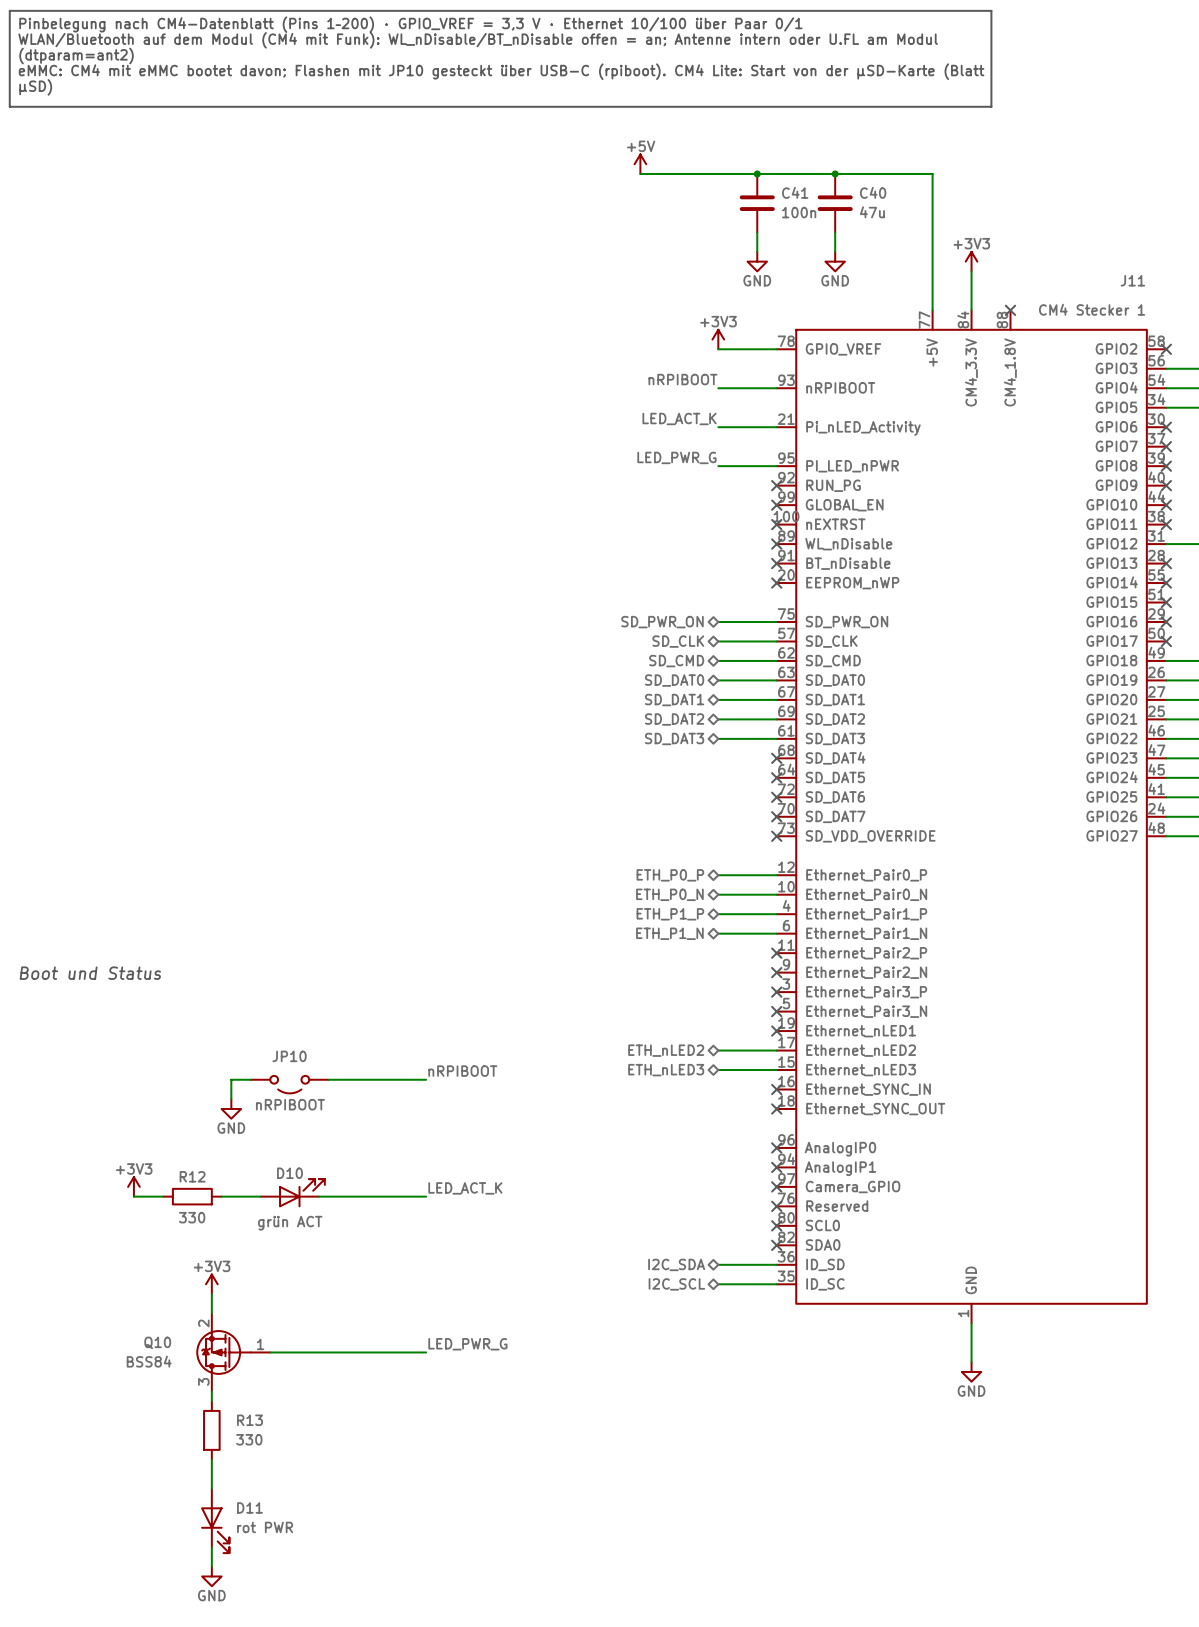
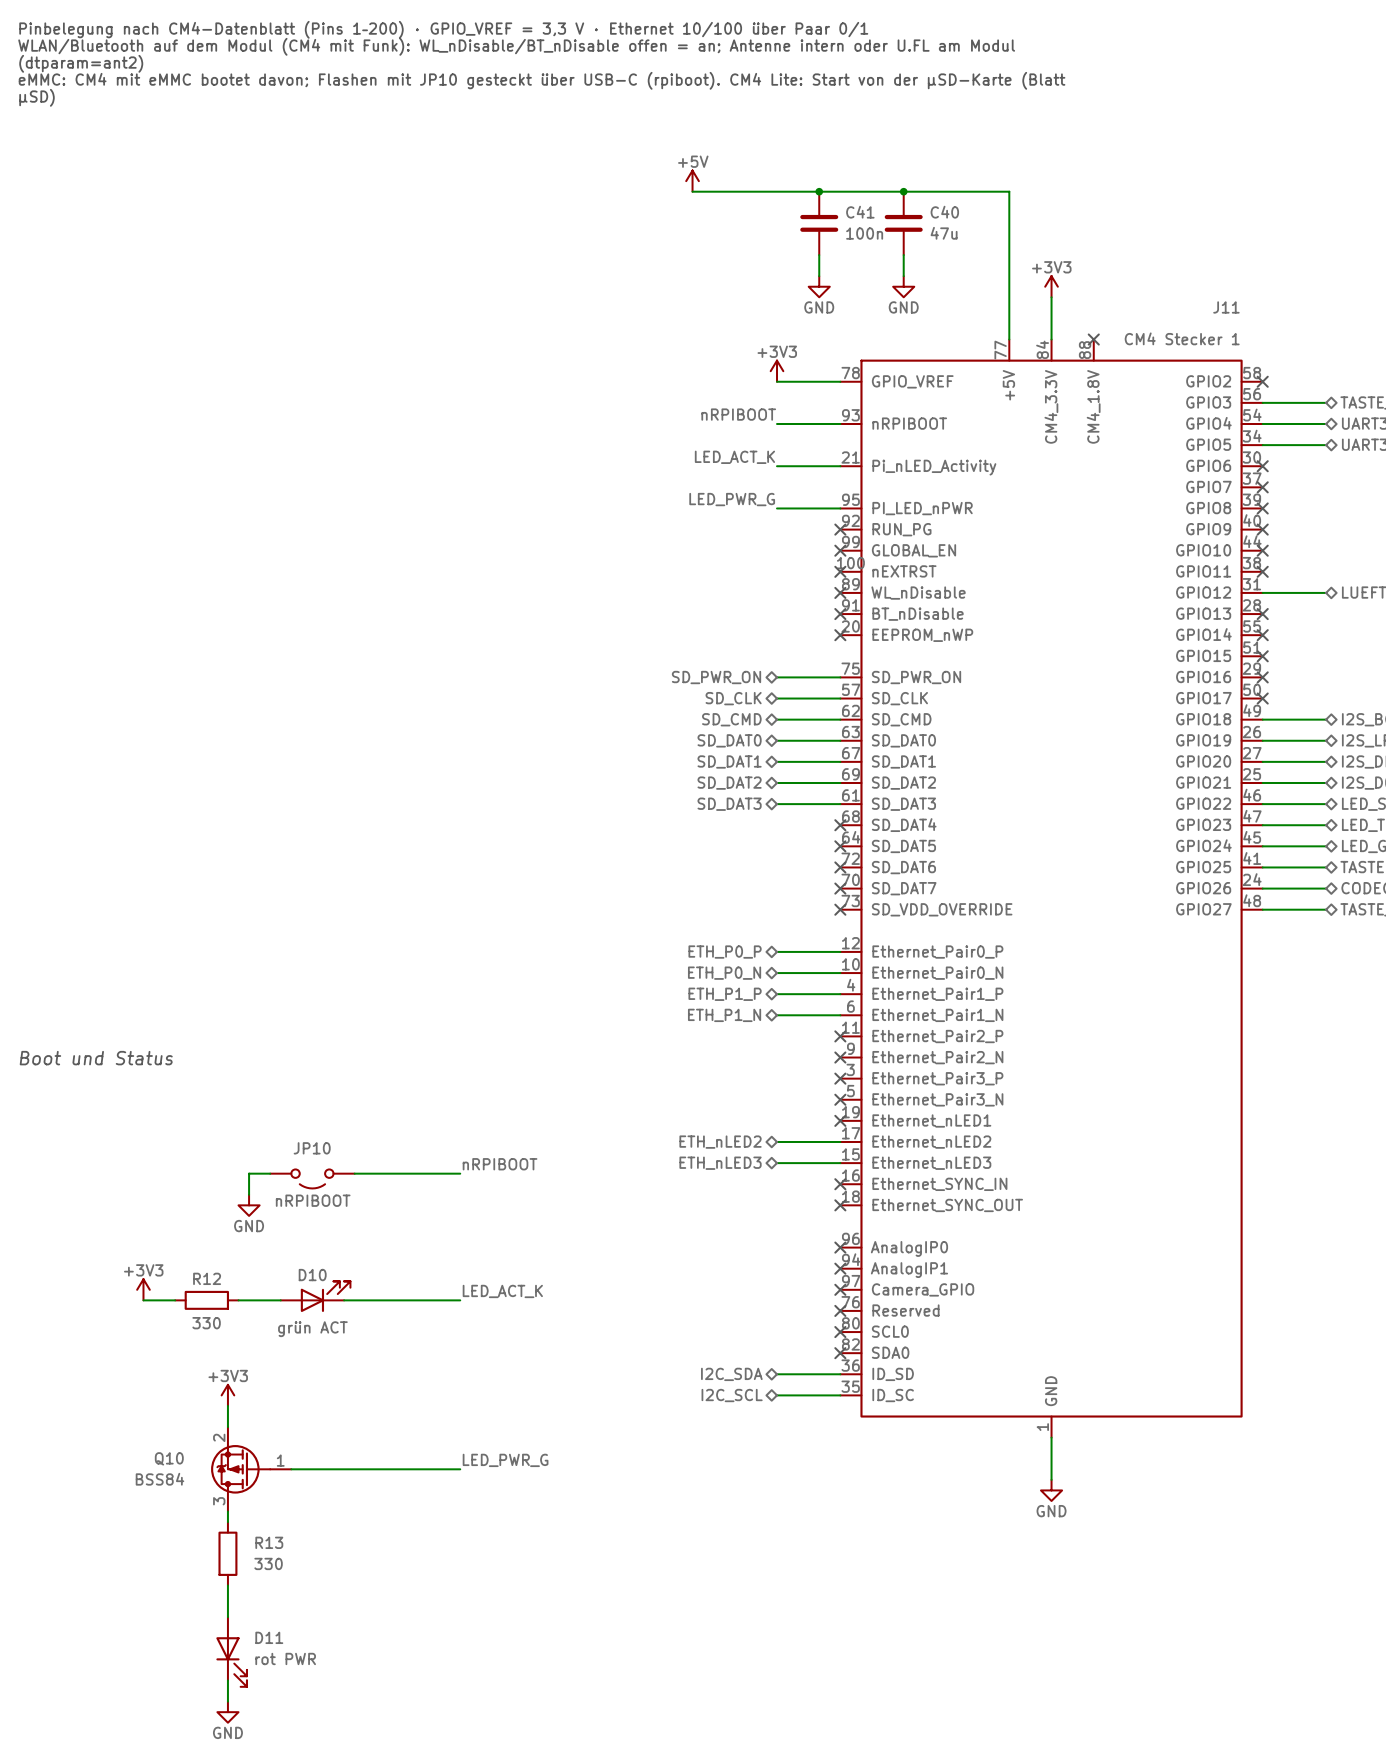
line: (9, 10) (991, 10) (991, 106) (9, 106) (9, 10) -> none

